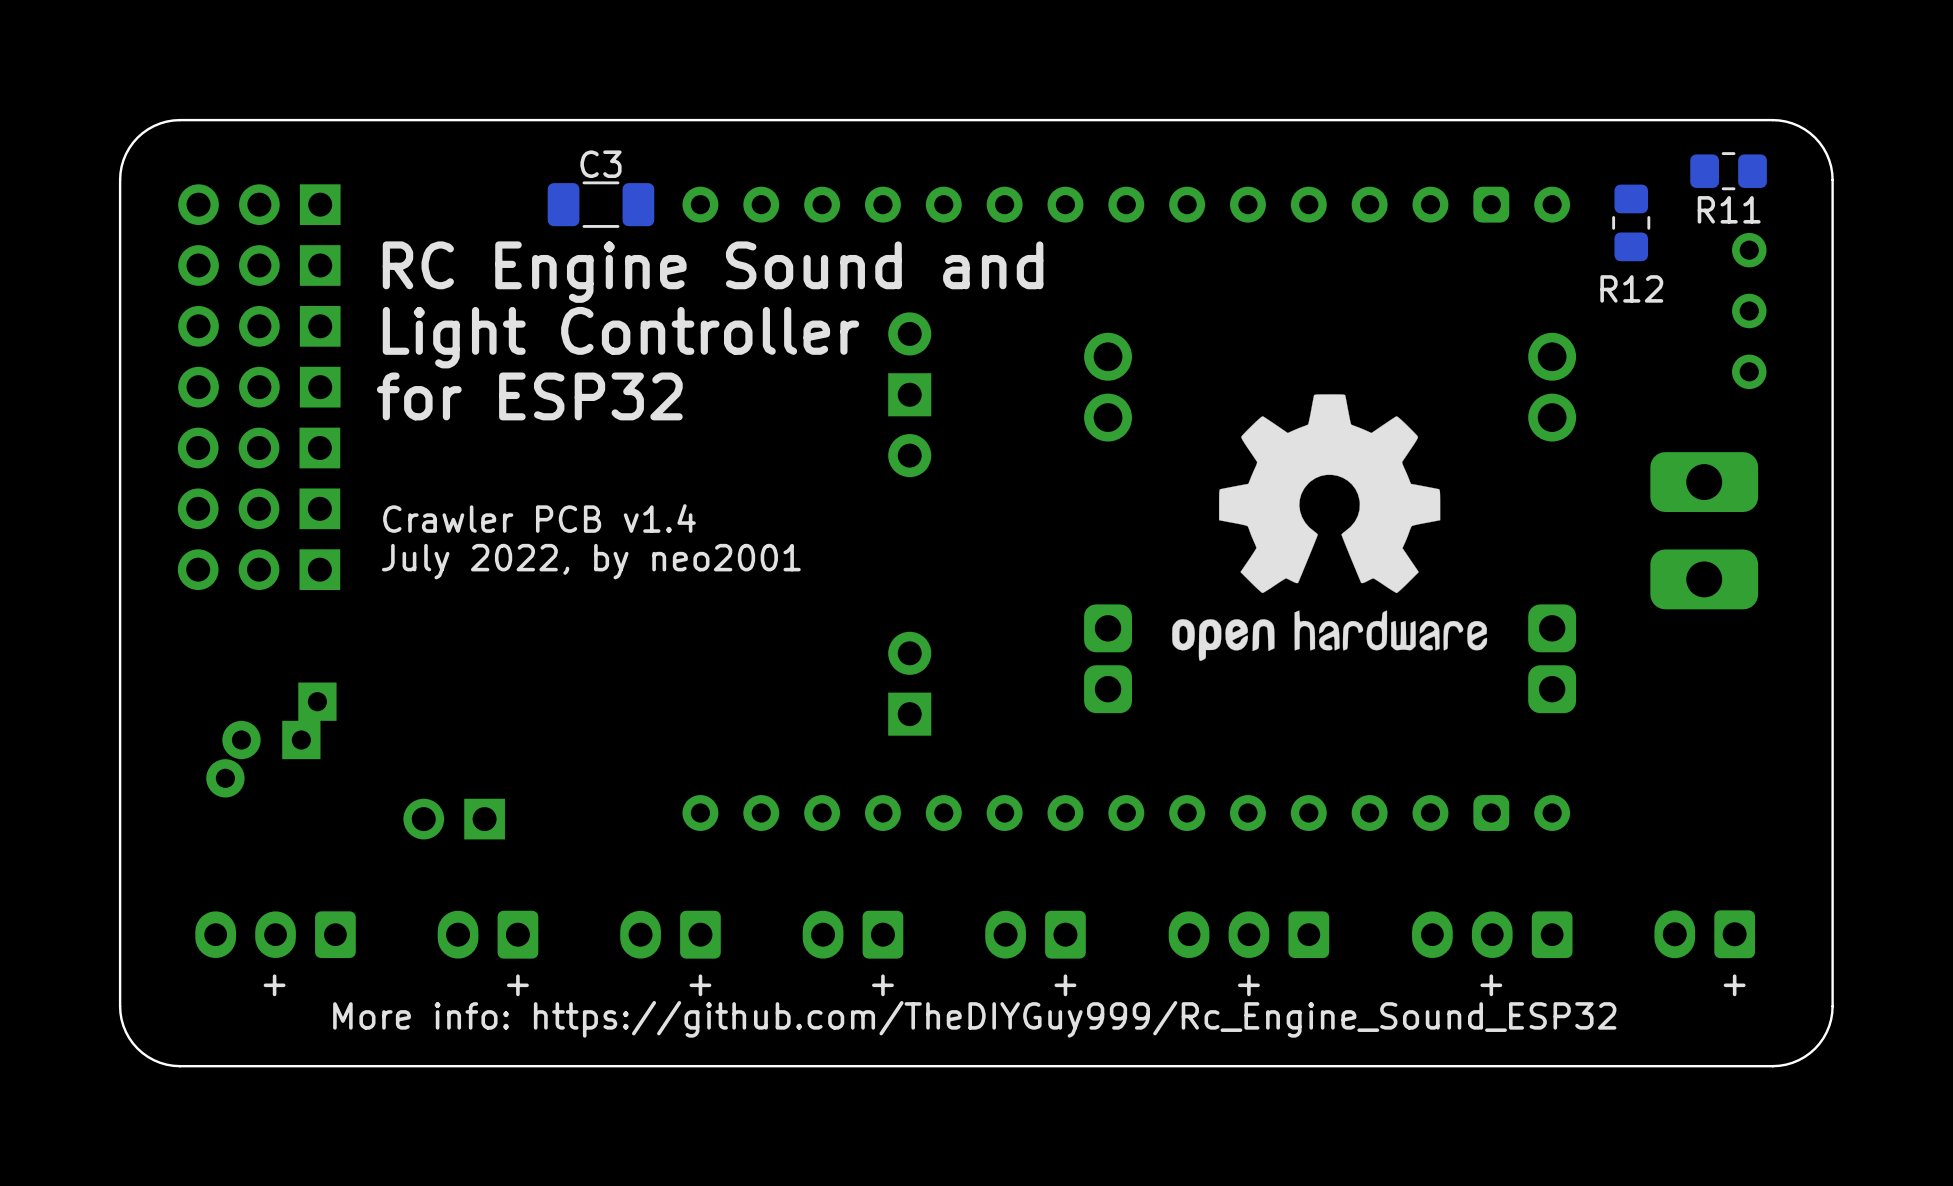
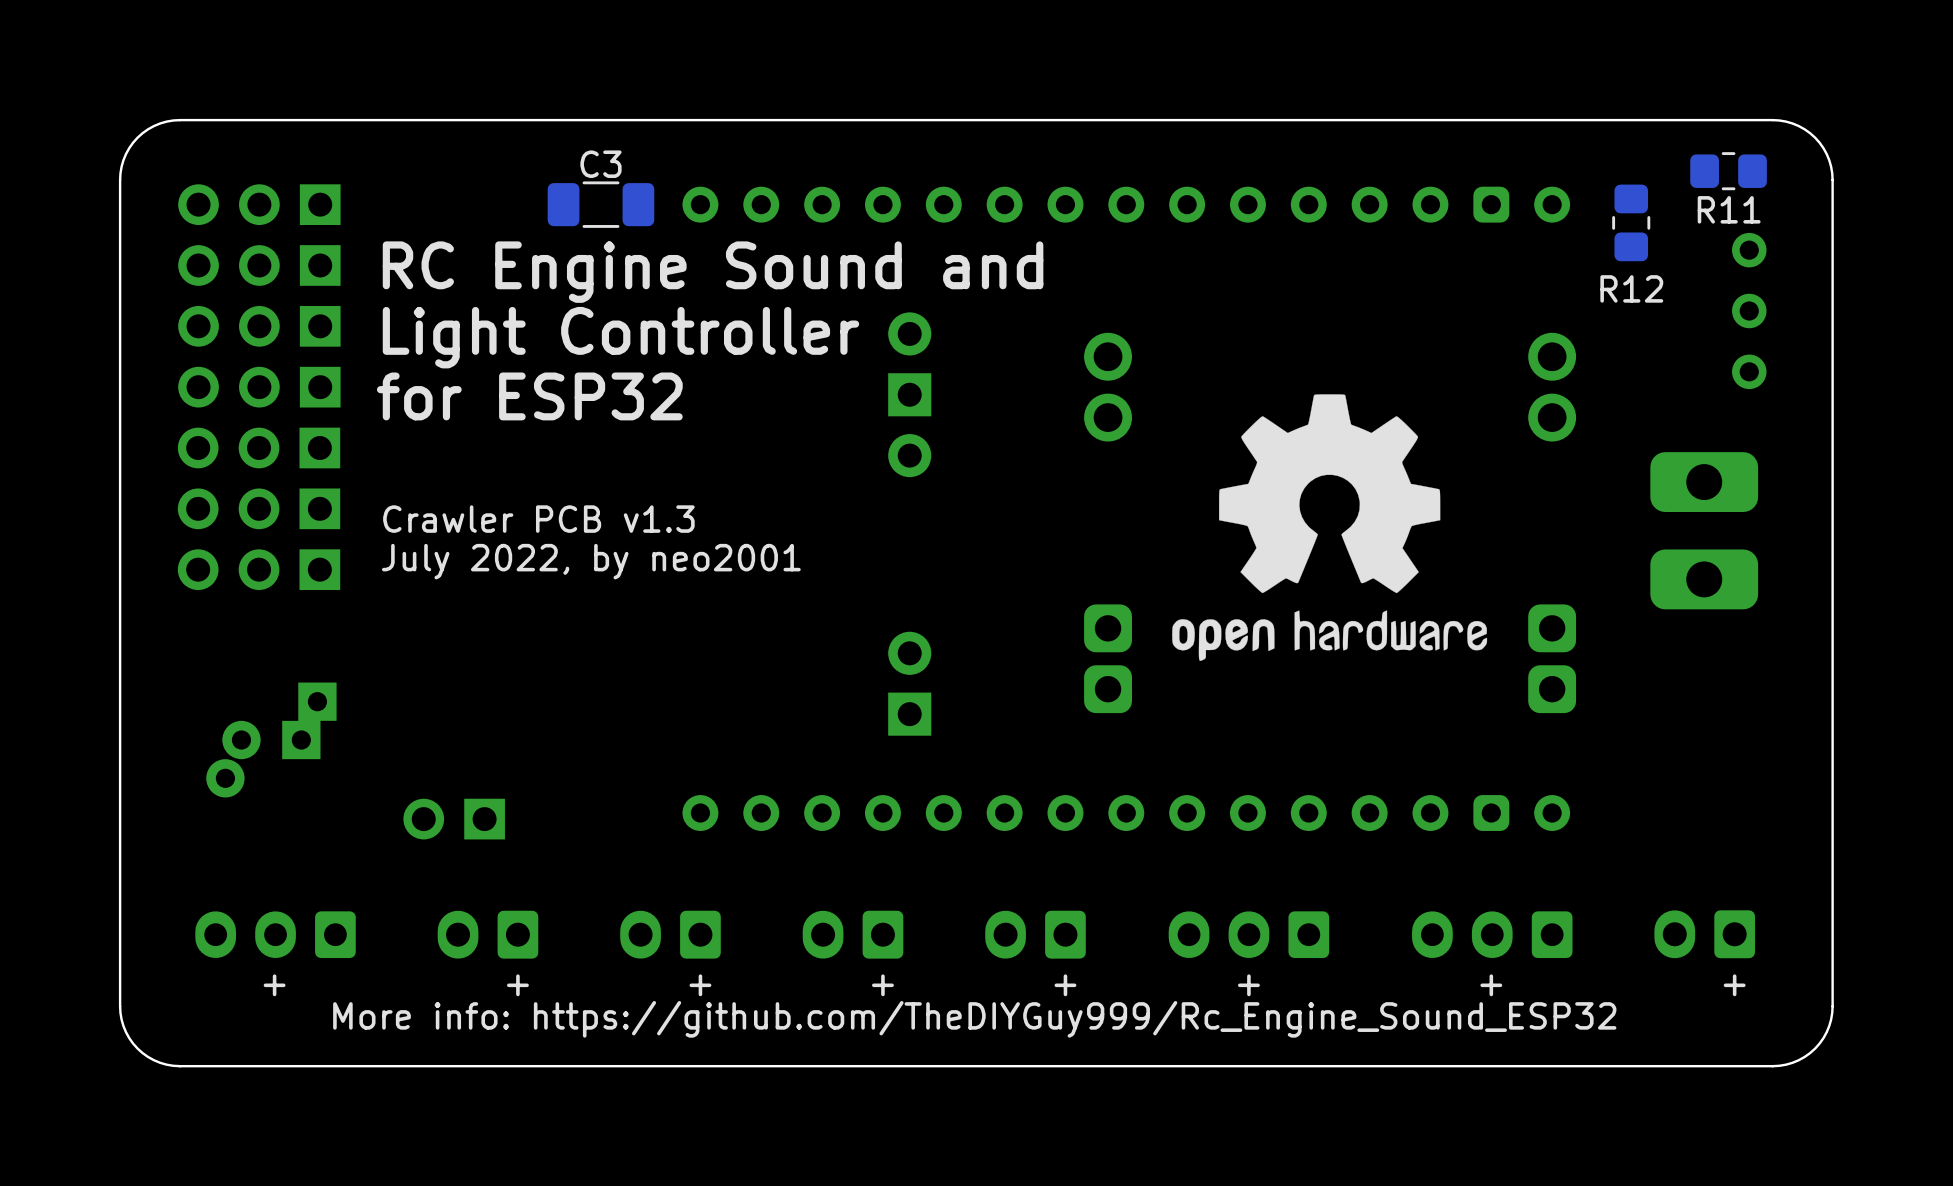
text: Crawler PCB v1.4 (539, 518) -> Crawler PCB v1.3 (538, 519)

